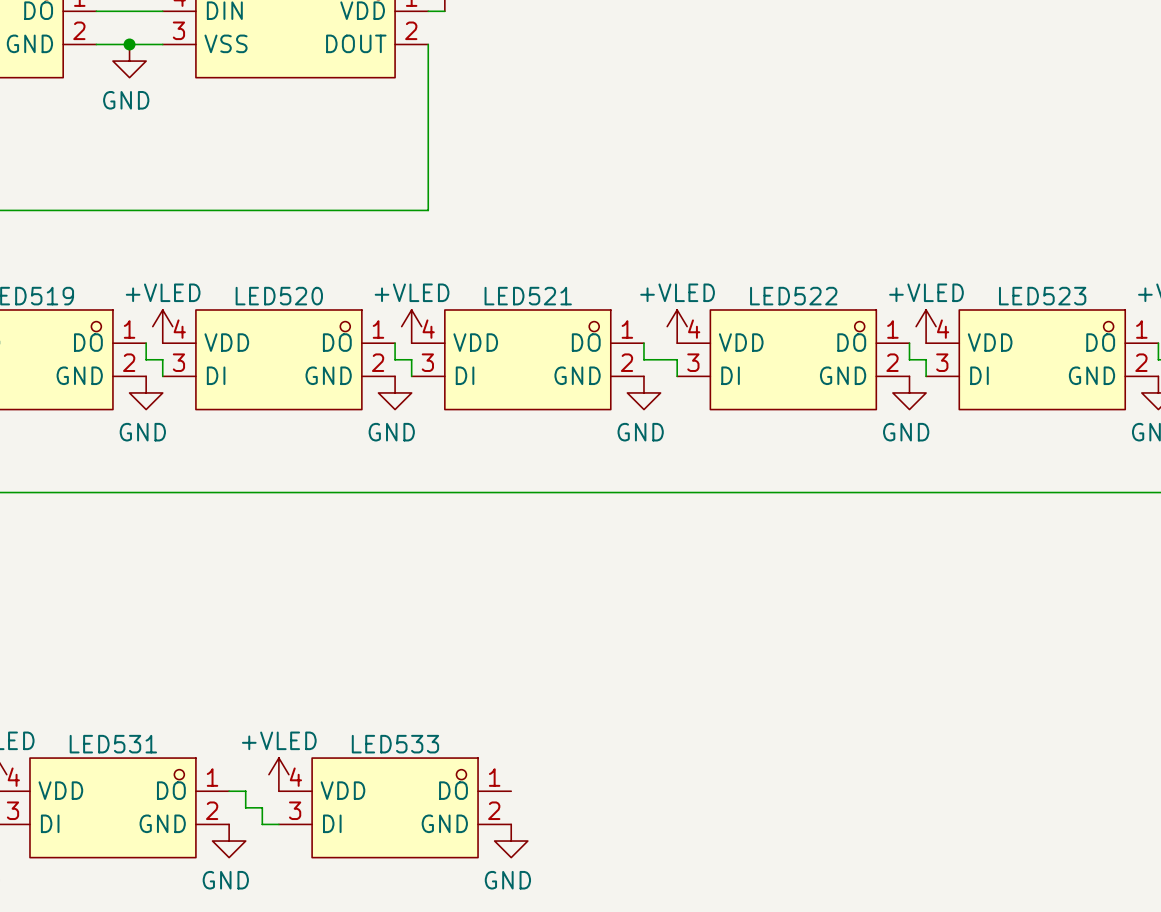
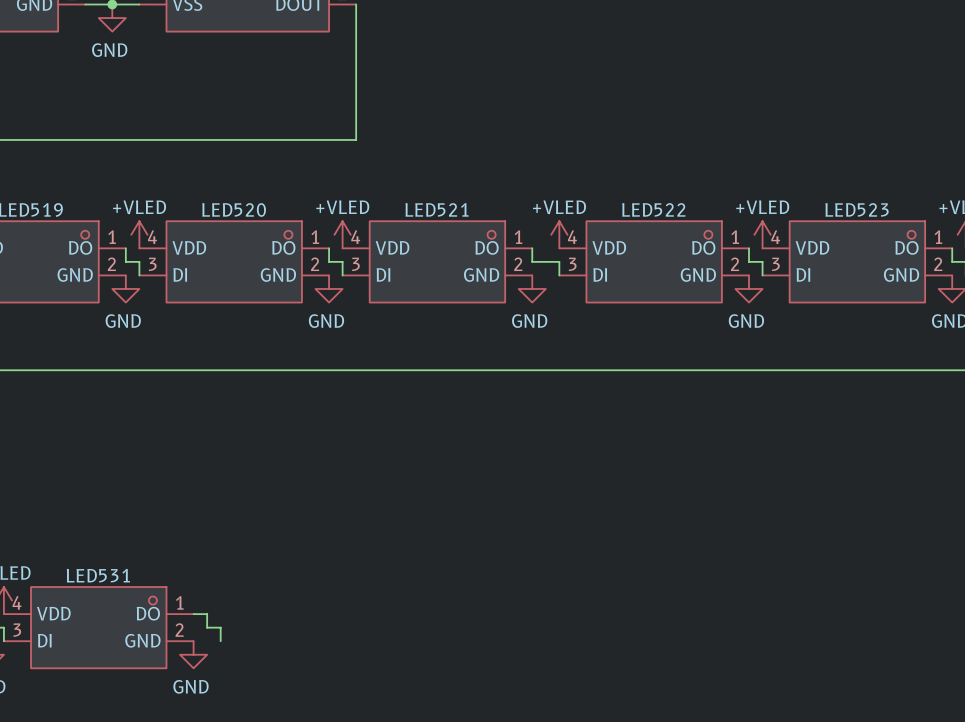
power symbol: +VLED (278, 774) -> none
LED533: (395, 807) -> none
wire: (262, 824) (278, 824) -> none
power symbol: GND (511, 841) -> none

